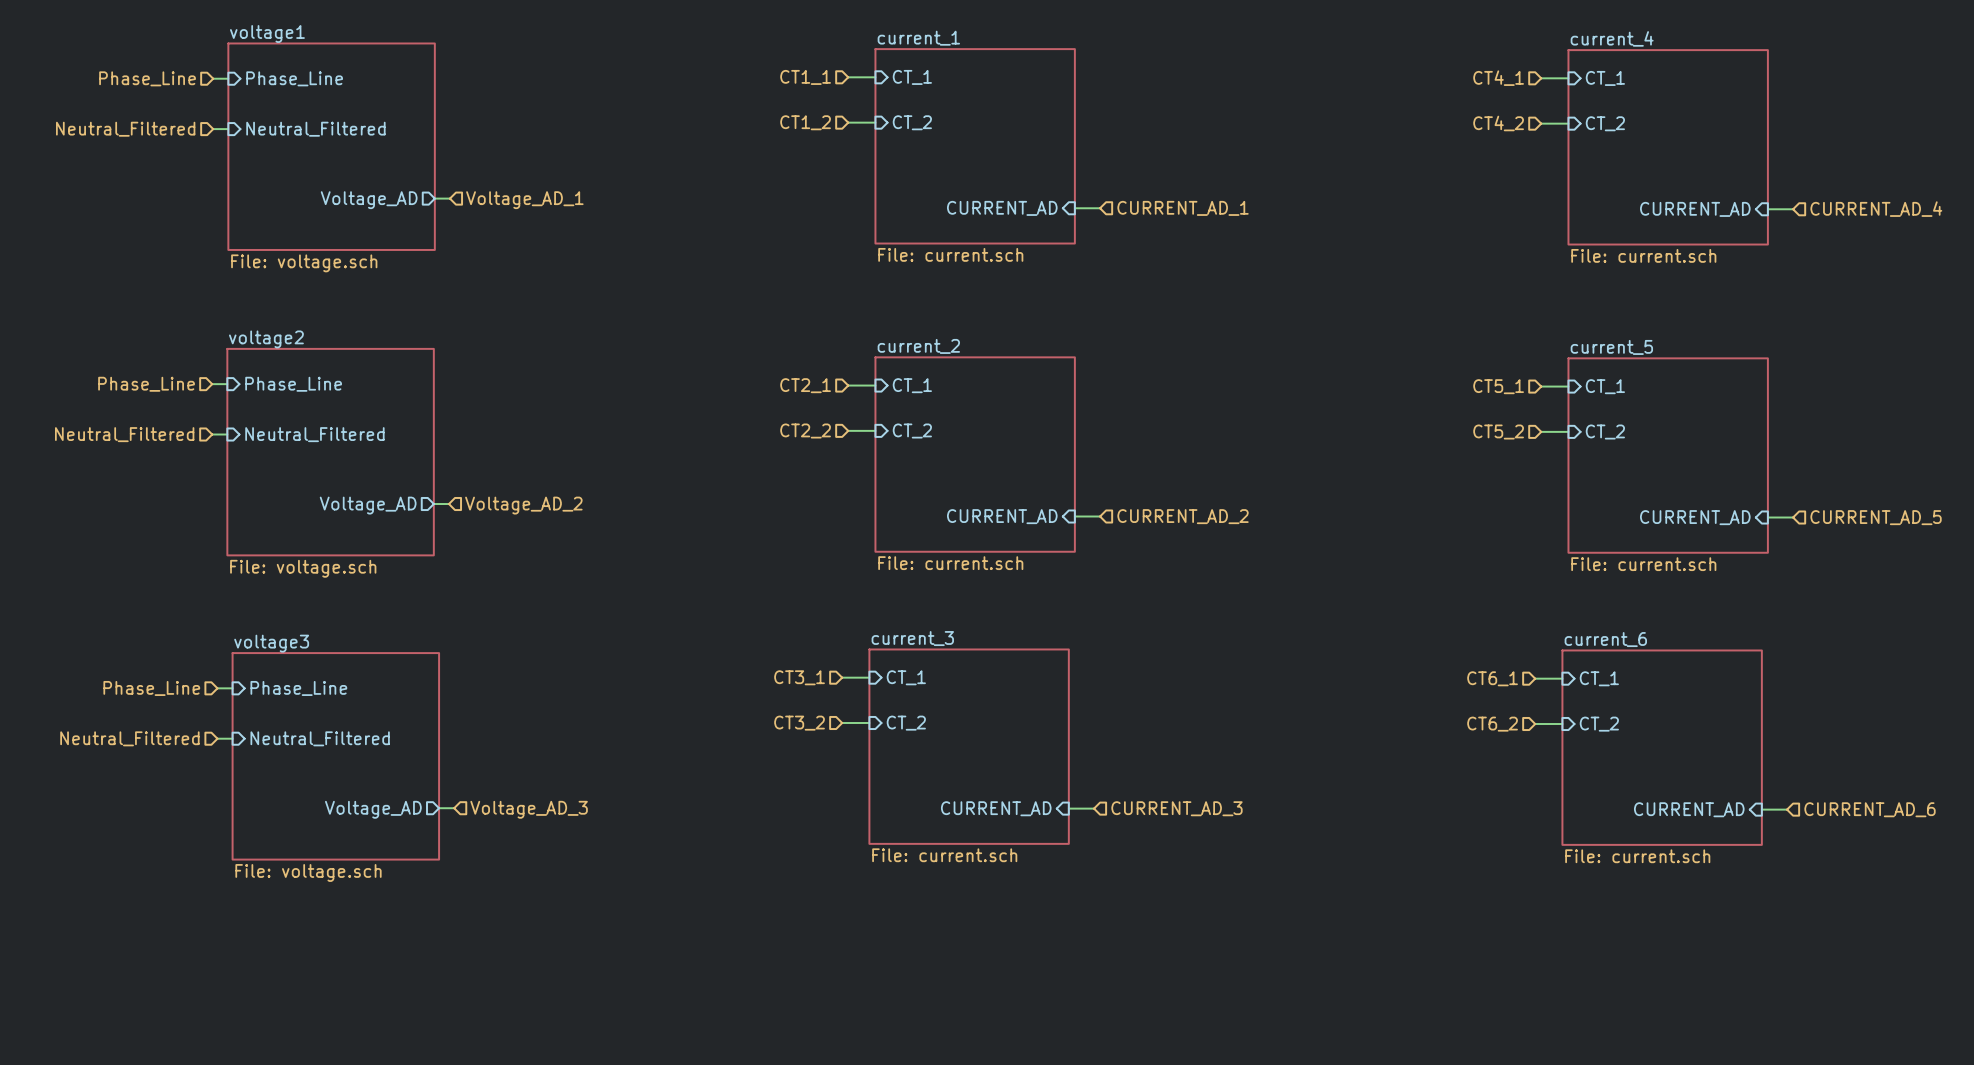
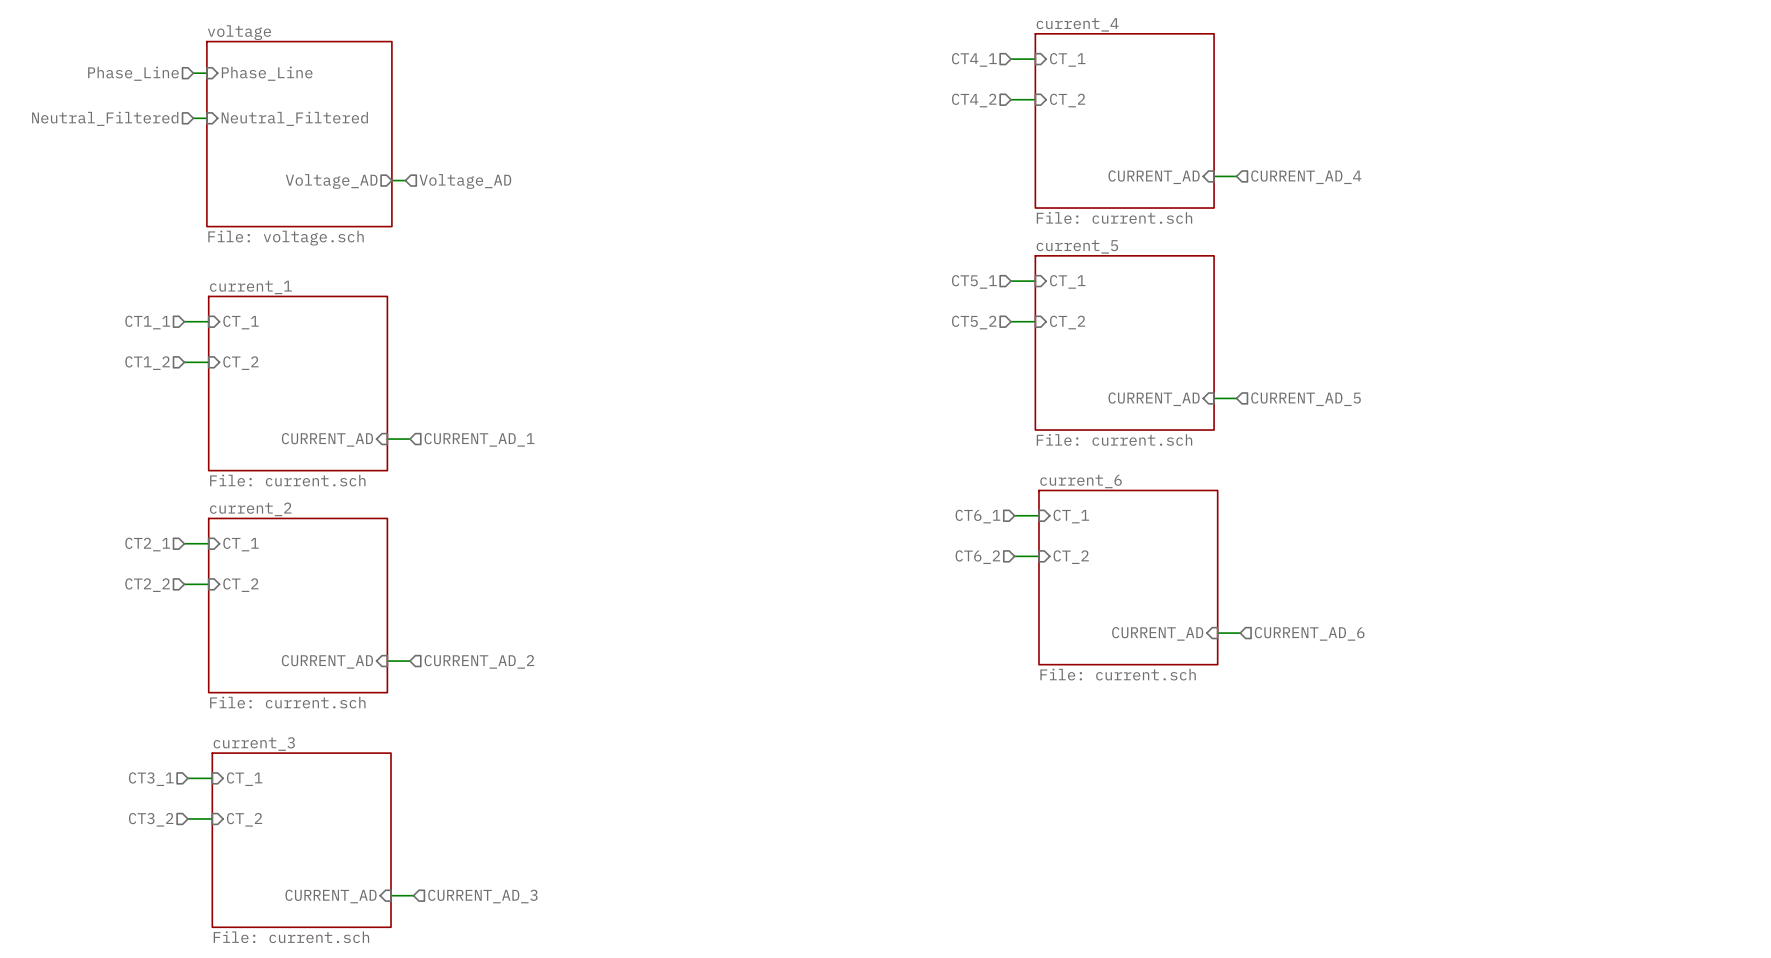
sheet voltage1 name: voltage1 (267, 33) -> voltage (239, 32)
hierarchical label: none -> CT4_1 (974, 59)
wire: none -> (1011, 59) (1035, 59)
sheet pin: none -> CT_1 (1067, 59)
hierarchical label: CT1_1 (805, 77) -> none
wire: (848, 77) (875, 77) -> none
sheet pin: CT_1 (912, 77) -> none
hierarchical label: CT4_1 (1498, 78) -> none
wire: (1541, 78) (1568, 78) -> none
sheet pin: CT_1 (1605, 78) -> none
hierarchical label: none -> CT4_2 (974, 100)
wire: none -> (1011, 99) (1035, 99)
sheet pin: none -> CT_2 (1067, 100)
hierarchical label: CT1_2 (805, 122) -> none
wire: (848, 122) (875, 122) -> none
sheet pin: CT_2 (912, 122) -> none
hierarchical label: CT4_2 (1498, 123) -> none
wire: (1541, 123) (1568, 123) -> none
sheet pin: CT_2 (1605, 123) -> none
sheet current_1 position: (975, 146) -> (298, 383)
sheet current_4 position: (1668, 147) -> (1124, 120)
wire: none -> (1214, 176) (1236, 176)
hierarchical label: none -> CURRENT_AD_4 (1306, 177)
sheet pin: none -> CURRENT_AD (1154, 177)
hierarchical label: Voltage_AD_1 (524, 200) -> Voltage_AD (465, 181)
sheet pin: CURRENT_AD (1002, 208) -> none
wire: (1074, 208) (1100, 208) -> none
hierarchical label: CURRENT_AD_1 (1183, 208) -> none
sheet pin: CURRENT_AD (1695, 209) -> none
wire: (1767, 209) (1793, 209) -> none
hierarchical label: CURRENT_AD_4 (1876, 209) -> none
hierarchical label: none -> CT5_1 (974, 281)
wire: none -> (1011, 281) (1035, 281)
sheet pin: none -> CT_1 (1067, 281)
hierarchical label: none -> CT1_1 (147, 322)
wire: none -> (184, 321) (208, 321)
sheet pin: none -> CT_1 (241, 322)
hierarchical label: none -> CT5_2 (974, 322)
wire: none -> (1011, 321) (1035, 321)
sheet pin: none -> CT_2 (1067, 322)
hierarchical label: Phase_Line (146, 384) -> none
wire: (212, 384) (227, 384) -> none
sheet pin: Phase_Line (293, 384) -> none
hierarchical label: CT2_1 (805, 385) -> none
wire: (848, 385) (875, 385) -> none
sheet pin: CT_1 (912, 385) -> none
hierarchical label: CT5_1 (1498, 386) -> none
wire: (1541, 386) (1568, 386) -> none
sheet pin: CT_1 (1605, 386) -> none
hierarchical label: none -> CT1_2 (147, 363)
wire: none -> (184, 362) (208, 362)
sheet pin: none -> CT_2 (240, 363)
wire: (848, 430) (875, 430) -> none
hierarchical label: CT2_2 (805, 431) -> none
sheet pin: CT_2 (912, 431) -> none
wire: (1541, 431) (1568, 431) -> none
hierarchical label: CT5_2 (1498, 432) -> none
sheet pin: CT_2 (1605, 432) -> none
hierarchical label: Neutral_Filtered (124, 434) -> none
wire: (212, 434) (227, 434) -> none
sheet pin: Neutral_Filtered (314, 434) -> none
sheet pin: none -> CURRENT_AD (1154, 399)
wire: none -> (1214, 398) (1236, 398)
hierarchical label: none -> CURRENT_AD_5 (1306, 399)
sheet voltage2: File: voltage.sch (330, 452) -> none
sheet current_2 position: (975, 454) -> (298, 605)
sheet current_5 position: (1668, 455) -> (1124, 342)
sheet pin: none -> CURRENT_AD (327, 439)
wire: none -> (387, 439) (409, 439)
hierarchical label: none -> CURRENT_AD_1 (479, 439)
wire: (433, 504) (448, 504) -> none
sheet pin: Voltage_AD (368, 505) -> none
hierarchical label: Voltage_AD_2 (523, 505) -> none
sheet pin: CURRENT_AD (1002, 516) -> none
wire: (1074, 516) (1100, 516) -> none
hierarchical label: CURRENT_AD_2 (1183, 516) -> none
sheet pin: CURRENT_AD (1695, 517) -> none
wire: (1767, 517) (1793, 517) -> none
hierarchical label: CURRENT_AD_5 (1876, 517) -> none
hierarchical label: none -> CT6_1 (977, 516)
wire: none -> (1014, 515) (1038, 515)
sheet pin: none -> CT_1 (1071, 516)
wire: none -> (184, 543) (208, 543)
hierarchical label: none -> CT2_1 (147, 544)
sheet pin: none -> CT_1 (241, 544)
hierarchical label: none -> CT6_2 (977, 557)
wire: none -> (1014, 556) (1038, 556)
sheet pin: none -> CT_2 (1071, 557)
hierarchical label: none -> CT2_2 (147, 585)
wire: none -> (184, 584) (208, 584)
sheet pin: none -> CT_2 (240, 585)
hierarchical label: CT3_1 (799, 677) -> none
wire: (842, 677) (869, 677) -> none
sheet pin: CT_1 (906, 677) -> none
hierarchical label: CT6_1 (1492, 678) -> none
wire: (1535, 678) (1562, 678) -> none
sheet pin: CT_1 (1599, 678) -> none
hierarchical label: Phase_Line (151, 688) -> none
wire: (217, 688) (232, 688) -> none
sheet pin: Phase_Line (298, 688) -> none
sheet pin: none -> CURRENT_AD (1157, 633)
wire: none -> (1217, 633) (1240, 633)
hierarchical label: none -> CURRENT_AD_6 (1309, 633)
wire: (842, 722) (869, 722) -> none
hierarchical label: CT3_2 (799, 723) -> none
sheet pin: CT_2 (906, 723) -> none
hierarchical label: CT6_2 (1492, 724) -> none
wire: (1535, 724) (1562, 724) -> none
sheet pin: CT_2 (1599, 724) -> none
wire: none -> (387, 661) (409, 661)
sheet pin: none -> CURRENT_AD (327, 661)
hierarchical label: none -> CURRENT_AD_2 (479, 661)
hierarchical label: Neutral_Filtered (129, 738) -> none
wire: (217, 738) (232, 738) -> none
sheet pin: Neutral_Filtered (320, 738) -> none
sheet current_3 position: (969, 746) -> (301, 840)
sheet current_6 position: (1662, 747) -> (1128, 577)
sheet voltage3: File: voltage.sch (335, 756) -> none
wire: (439, 808) (454, 808) -> none
sheet pin: CURRENT_AD (996, 808) -> none
wire: (1068, 808) (1094, 808) -> none
hierarchical label: CURRENT_AD_3 (1176, 808) -> none
sheet pin: Voltage_AD (373, 809) -> none
hierarchical label: Voltage_AD_3 (529, 809) -> none
sheet pin: CURRENT_AD (1689, 809) -> none
wire: (1761, 809) (1787, 809) -> none
hierarchical label: CURRENT_AD_6 (1870, 809) -> none
hierarchical label: none -> CT3_1 (151, 779)
wire: none -> (187, 778) (212, 778)
sheet pin: none -> CT_1 (244, 779)
hierarchical label: none -> CT3_2 (151, 819)
wire: none -> (187, 818) (212, 818)
sheet pin: none -> CT_2 (244, 819)
sheet pin: none -> CURRENT_AD (331, 896)
wire: none -> (391, 895) (413, 895)
hierarchical label: none -> CURRENT_AD_3 (482, 896)

